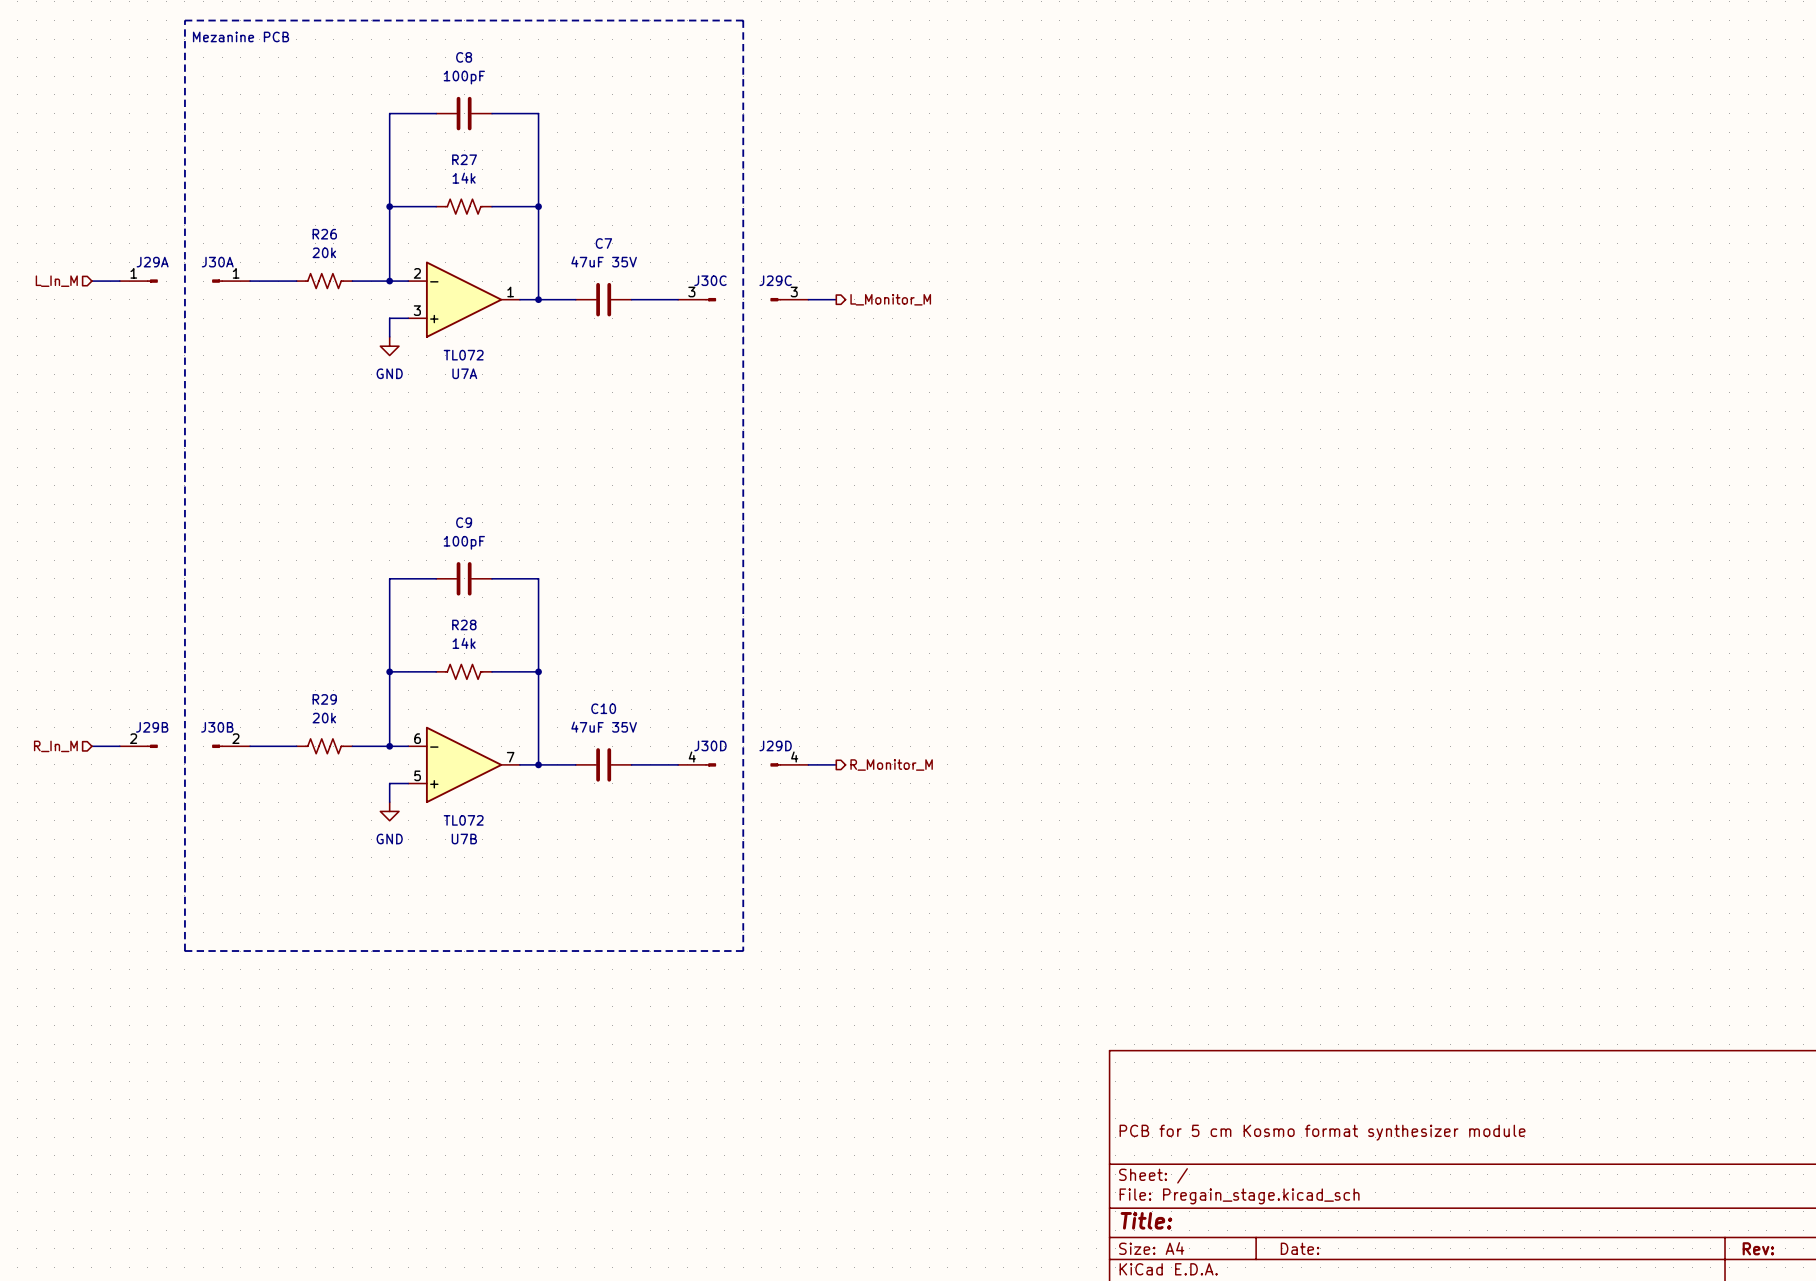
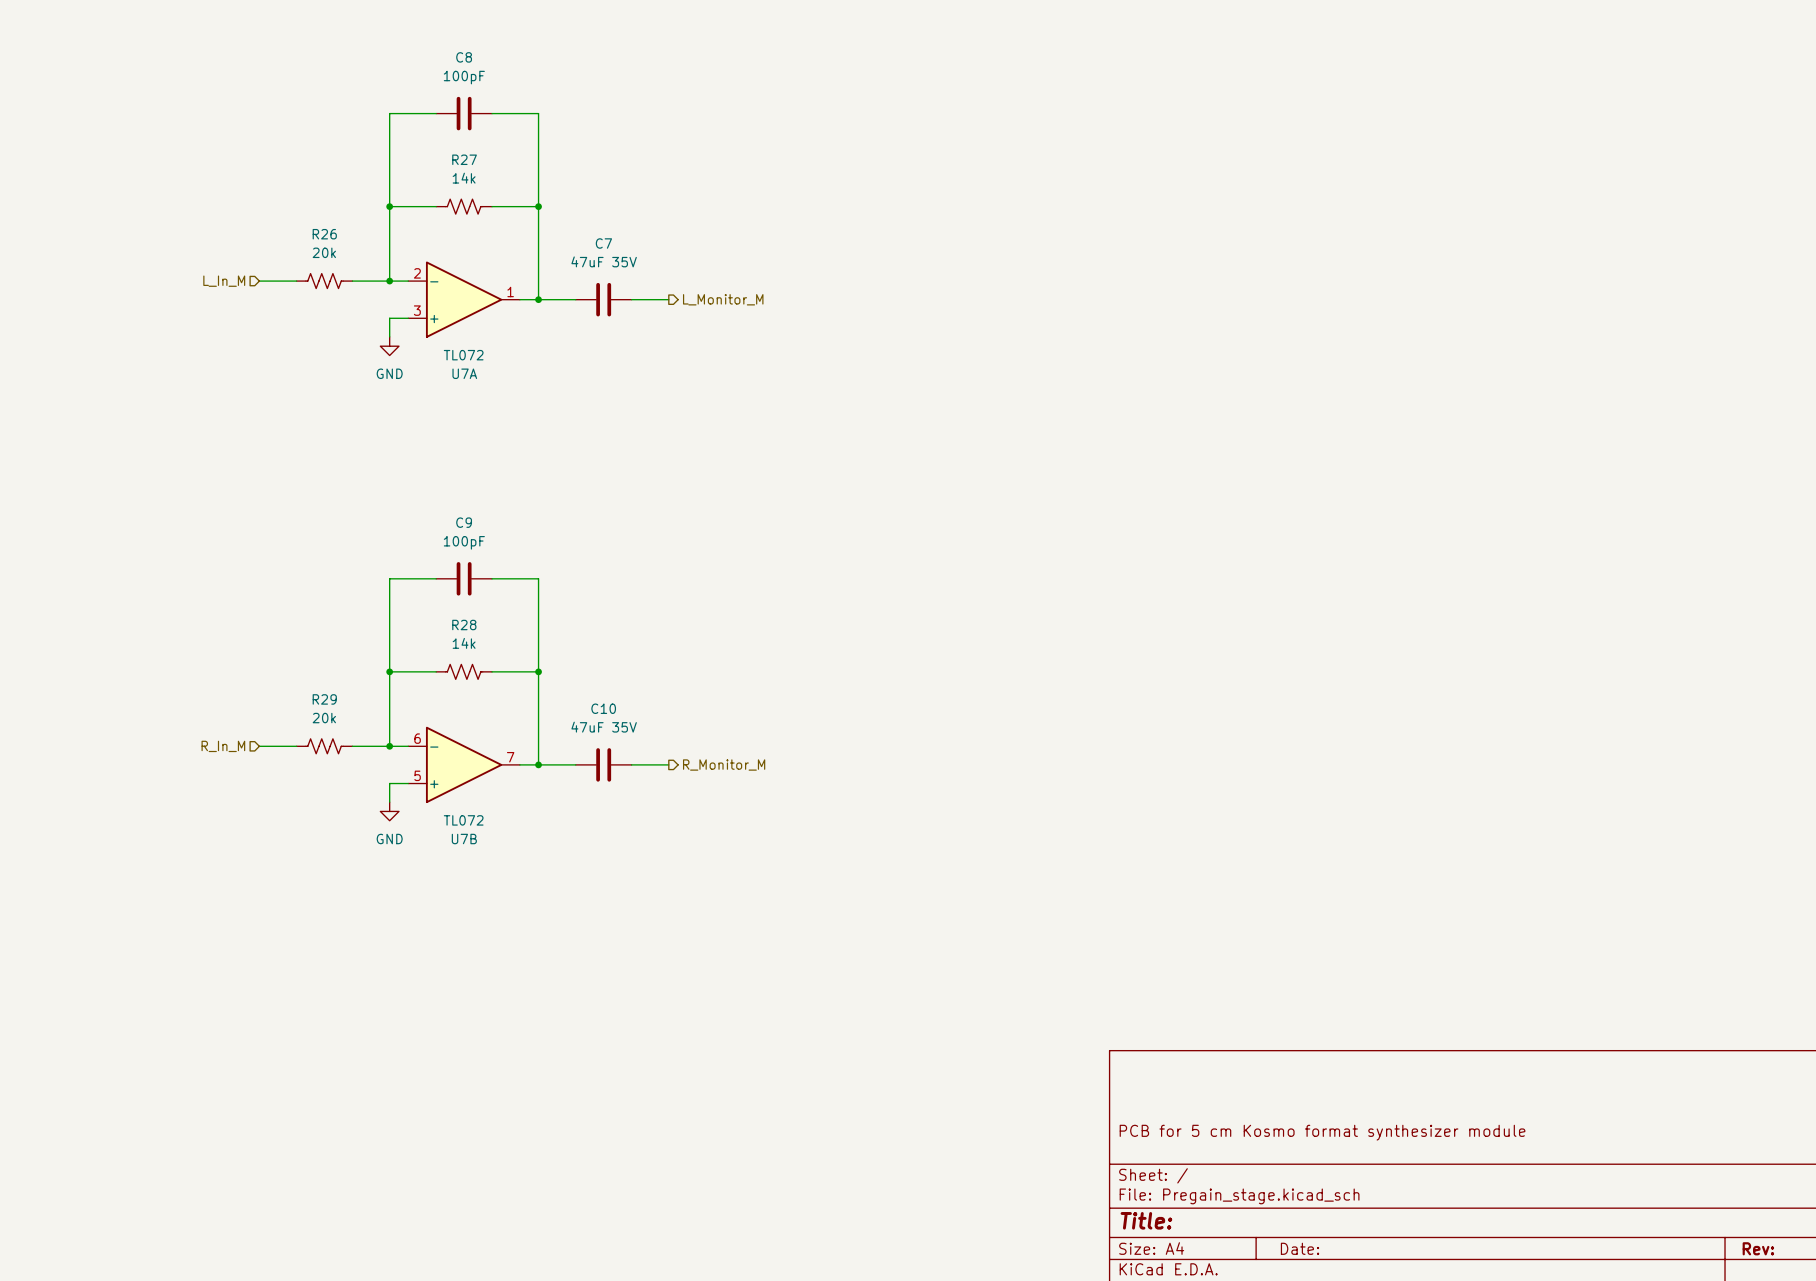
line: (184, 20) (743, 20) (743, 951) (184, 951) (184, 20) -> none
text: Mezanine PCB (241, 36) -> none
hierarchical label position: L_In_M (56, 281) -> L_In_M (224, 281)
wire: (91, 281) (119, 281) -> none
J29A: (138, 281) -> none
J30A: (231, 281) -> none
wire: (250, 281) (259, 281) -> none
wire: (668, 299) (678, 299) -> none
J30C: (697, 299) -> none
J29C: (789, 299) -> none
wire: (808, 299) (836, 299) -> none
hierarchical label position: L_Monitor_M (890, 299) -> L_Monitor_M (723, 299)
hierarchical label position: R_In_M (55, 746) -> R_In_M (223, 746)
wire: (91, 746) (119, 746) -> none
J29B: (138, 746) -> none
J30B: (231, 746) -> none
wire: (250, 746) (259, 746) -> none
wire: (668, 764) (678, 764) -> none
J30D: (697, 764) -> none
J29D: (789, 764) -> none
wire: (808, 764) (836, 764) -> none
hierarchical label position: R_Monitor_M (891, 765) -> R_Monitor_M (724, 765)

